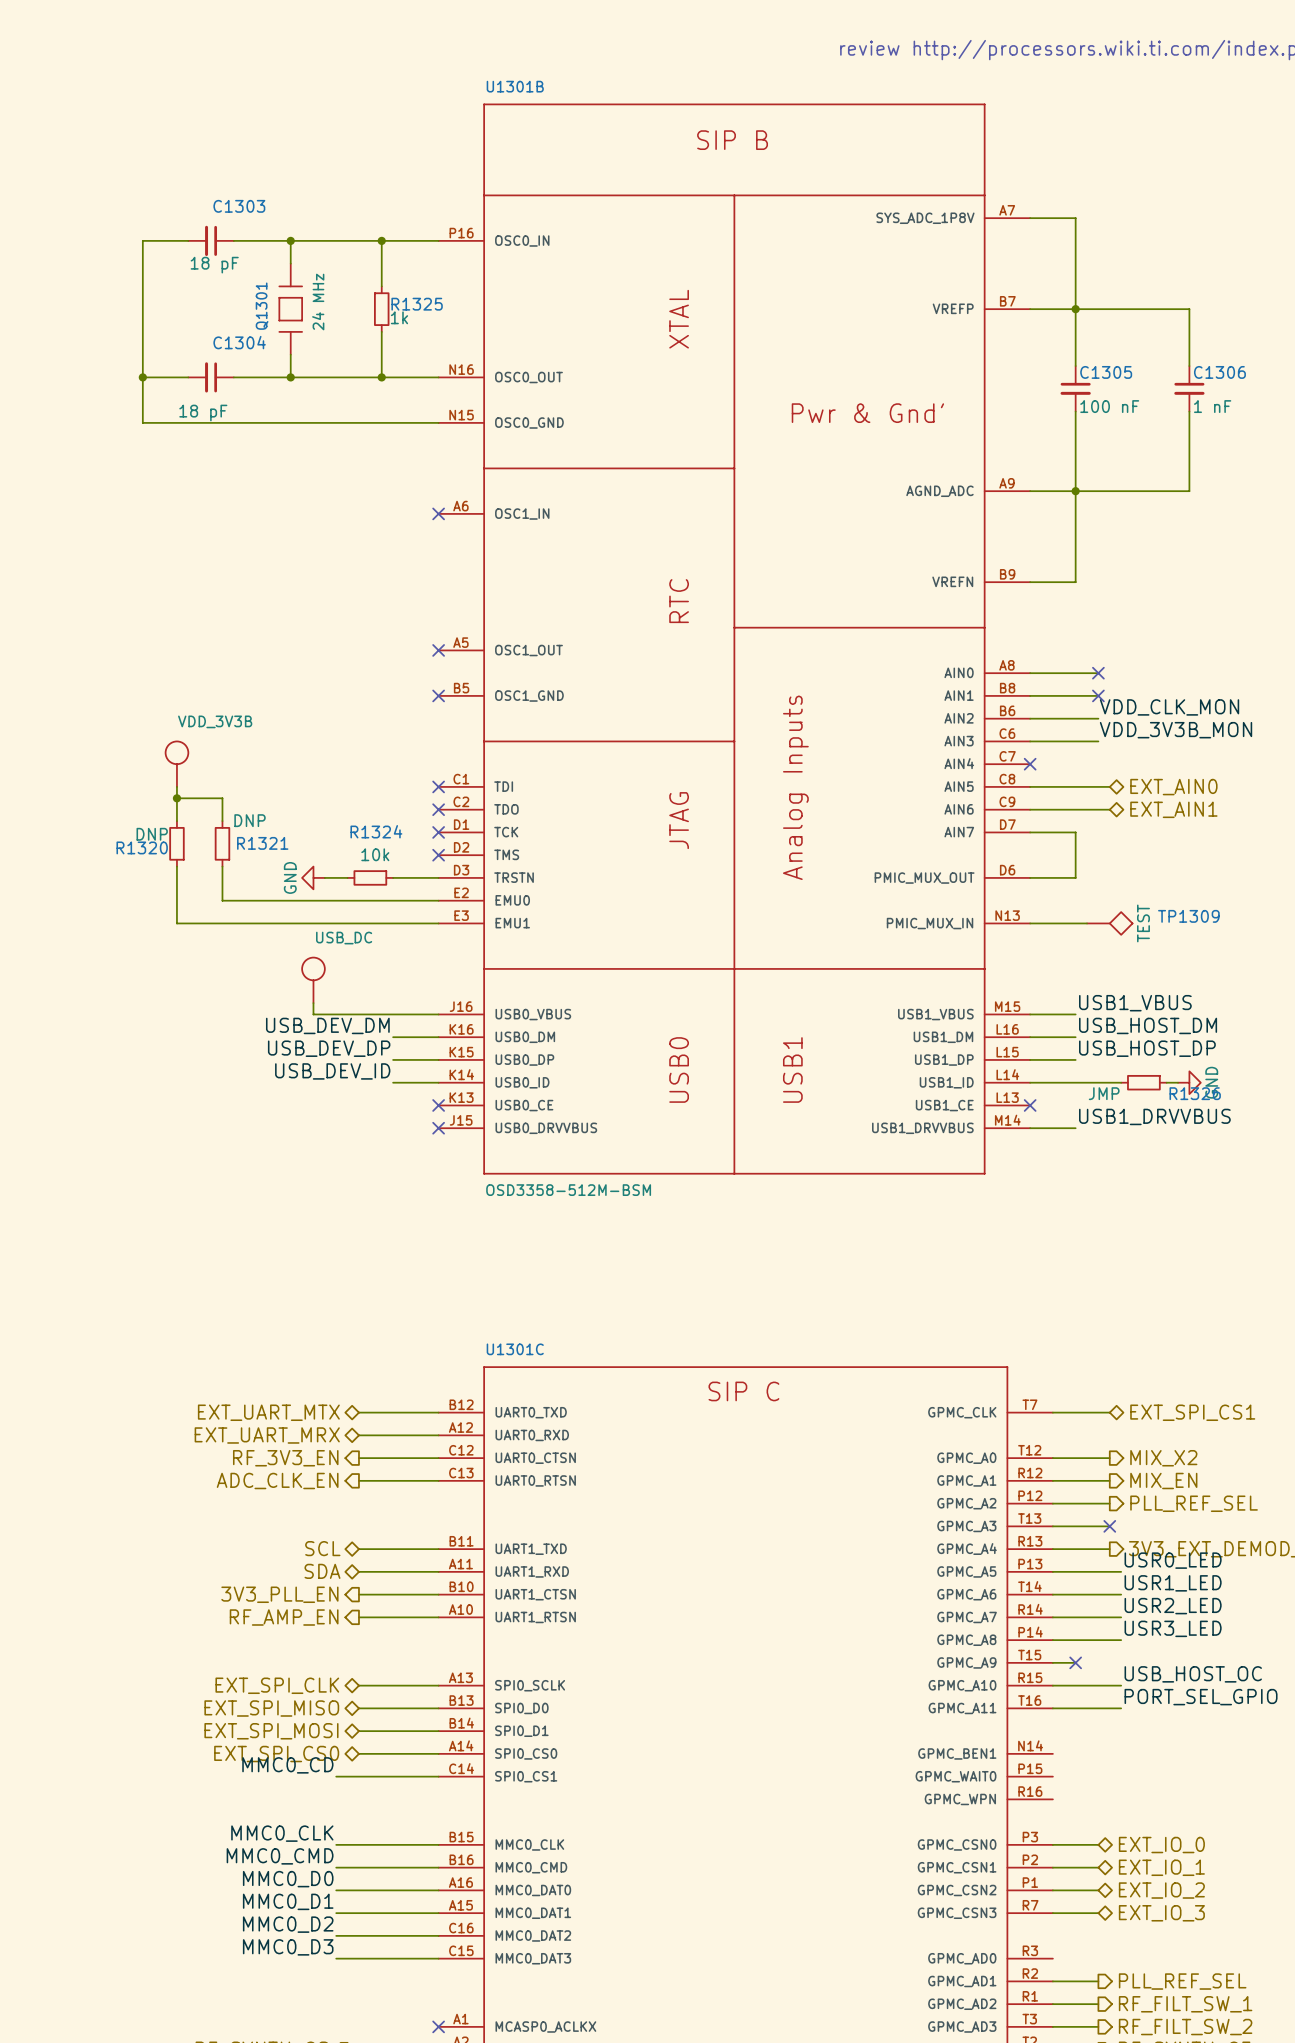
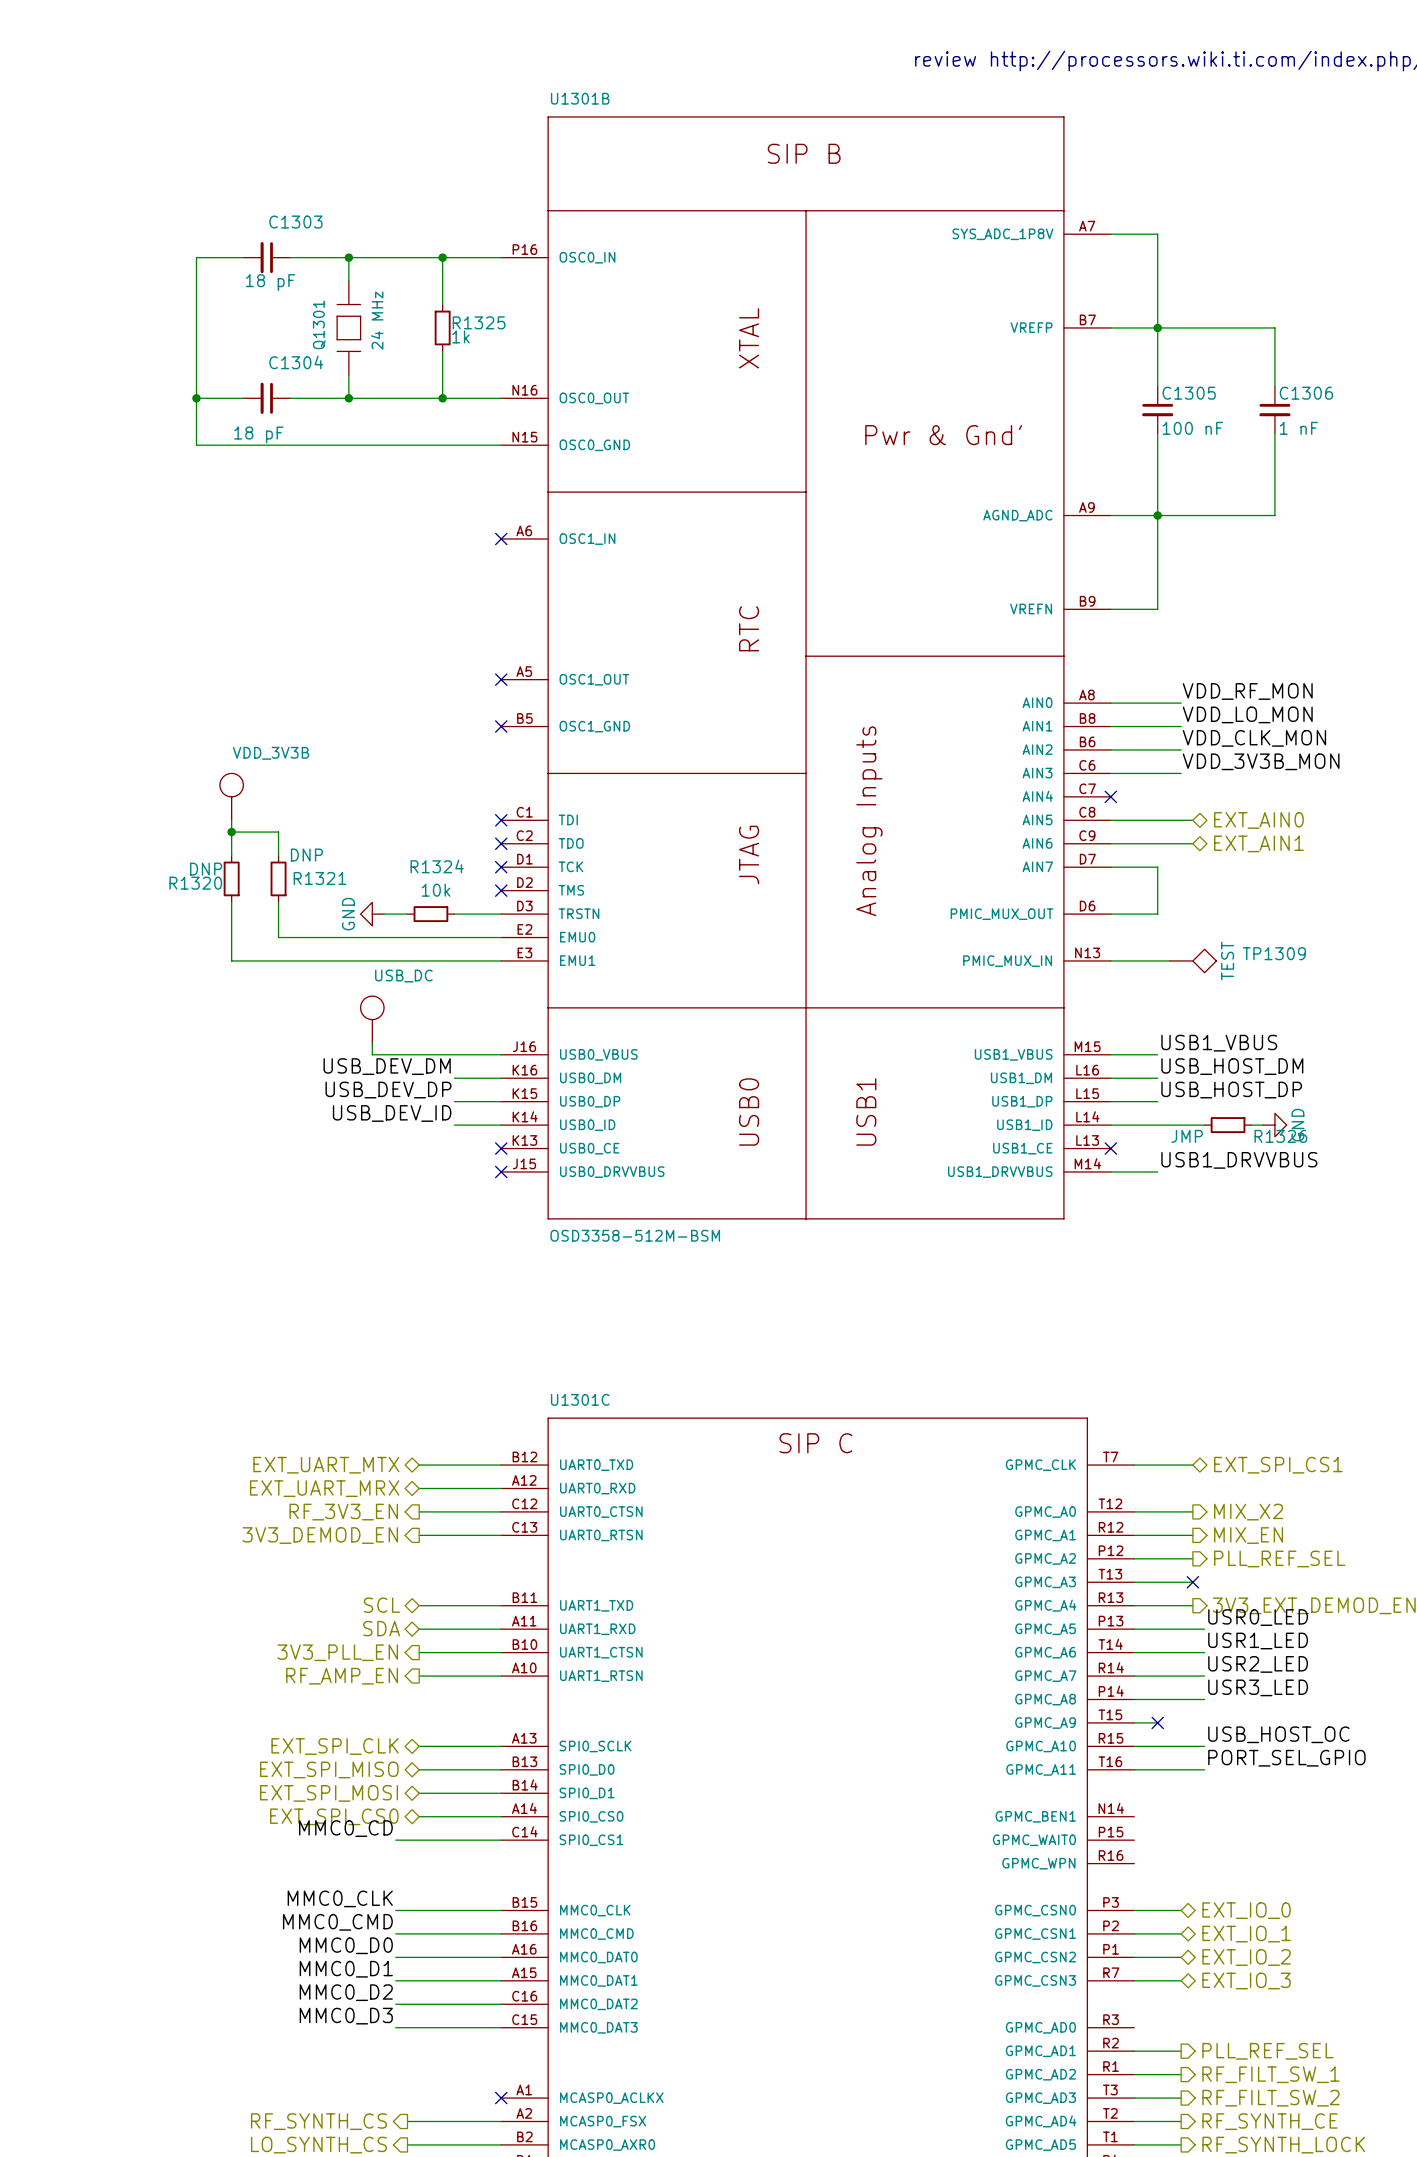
label: none -> VDD_RF_MON (1247, 691)
no-connect mark: (1098, 673) -> none
label: none -> VDD_LO_MON (1247, 714)
no-connect mark: (1098, 695) -> none
hierarchical label: ADC_CLK_EN (277, 1481) -> 3V3_DEMOD_EN (320, 1535)

